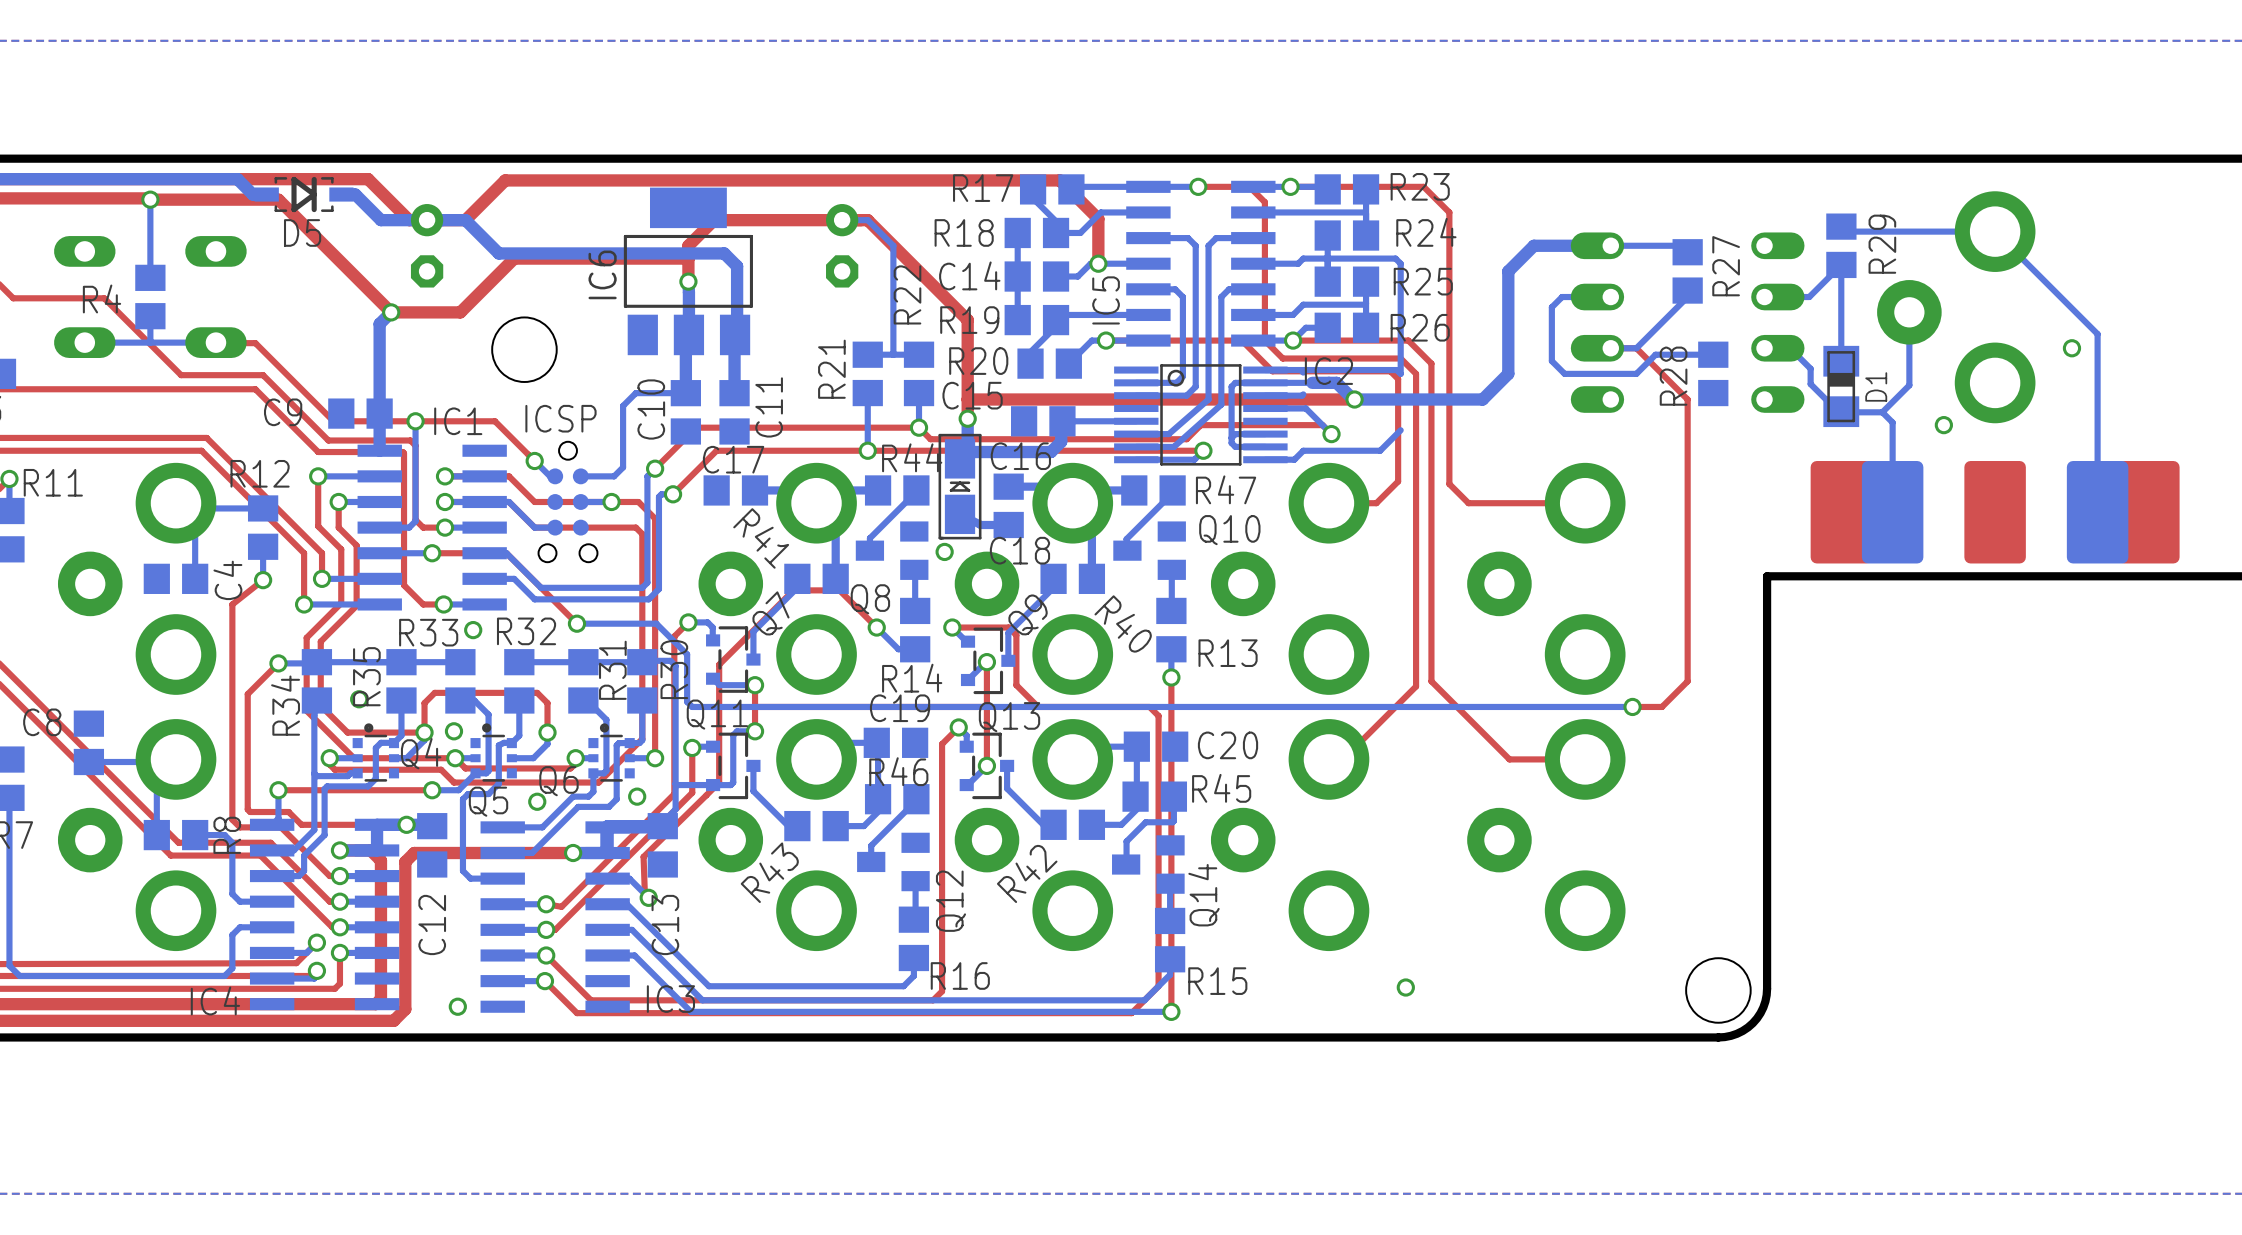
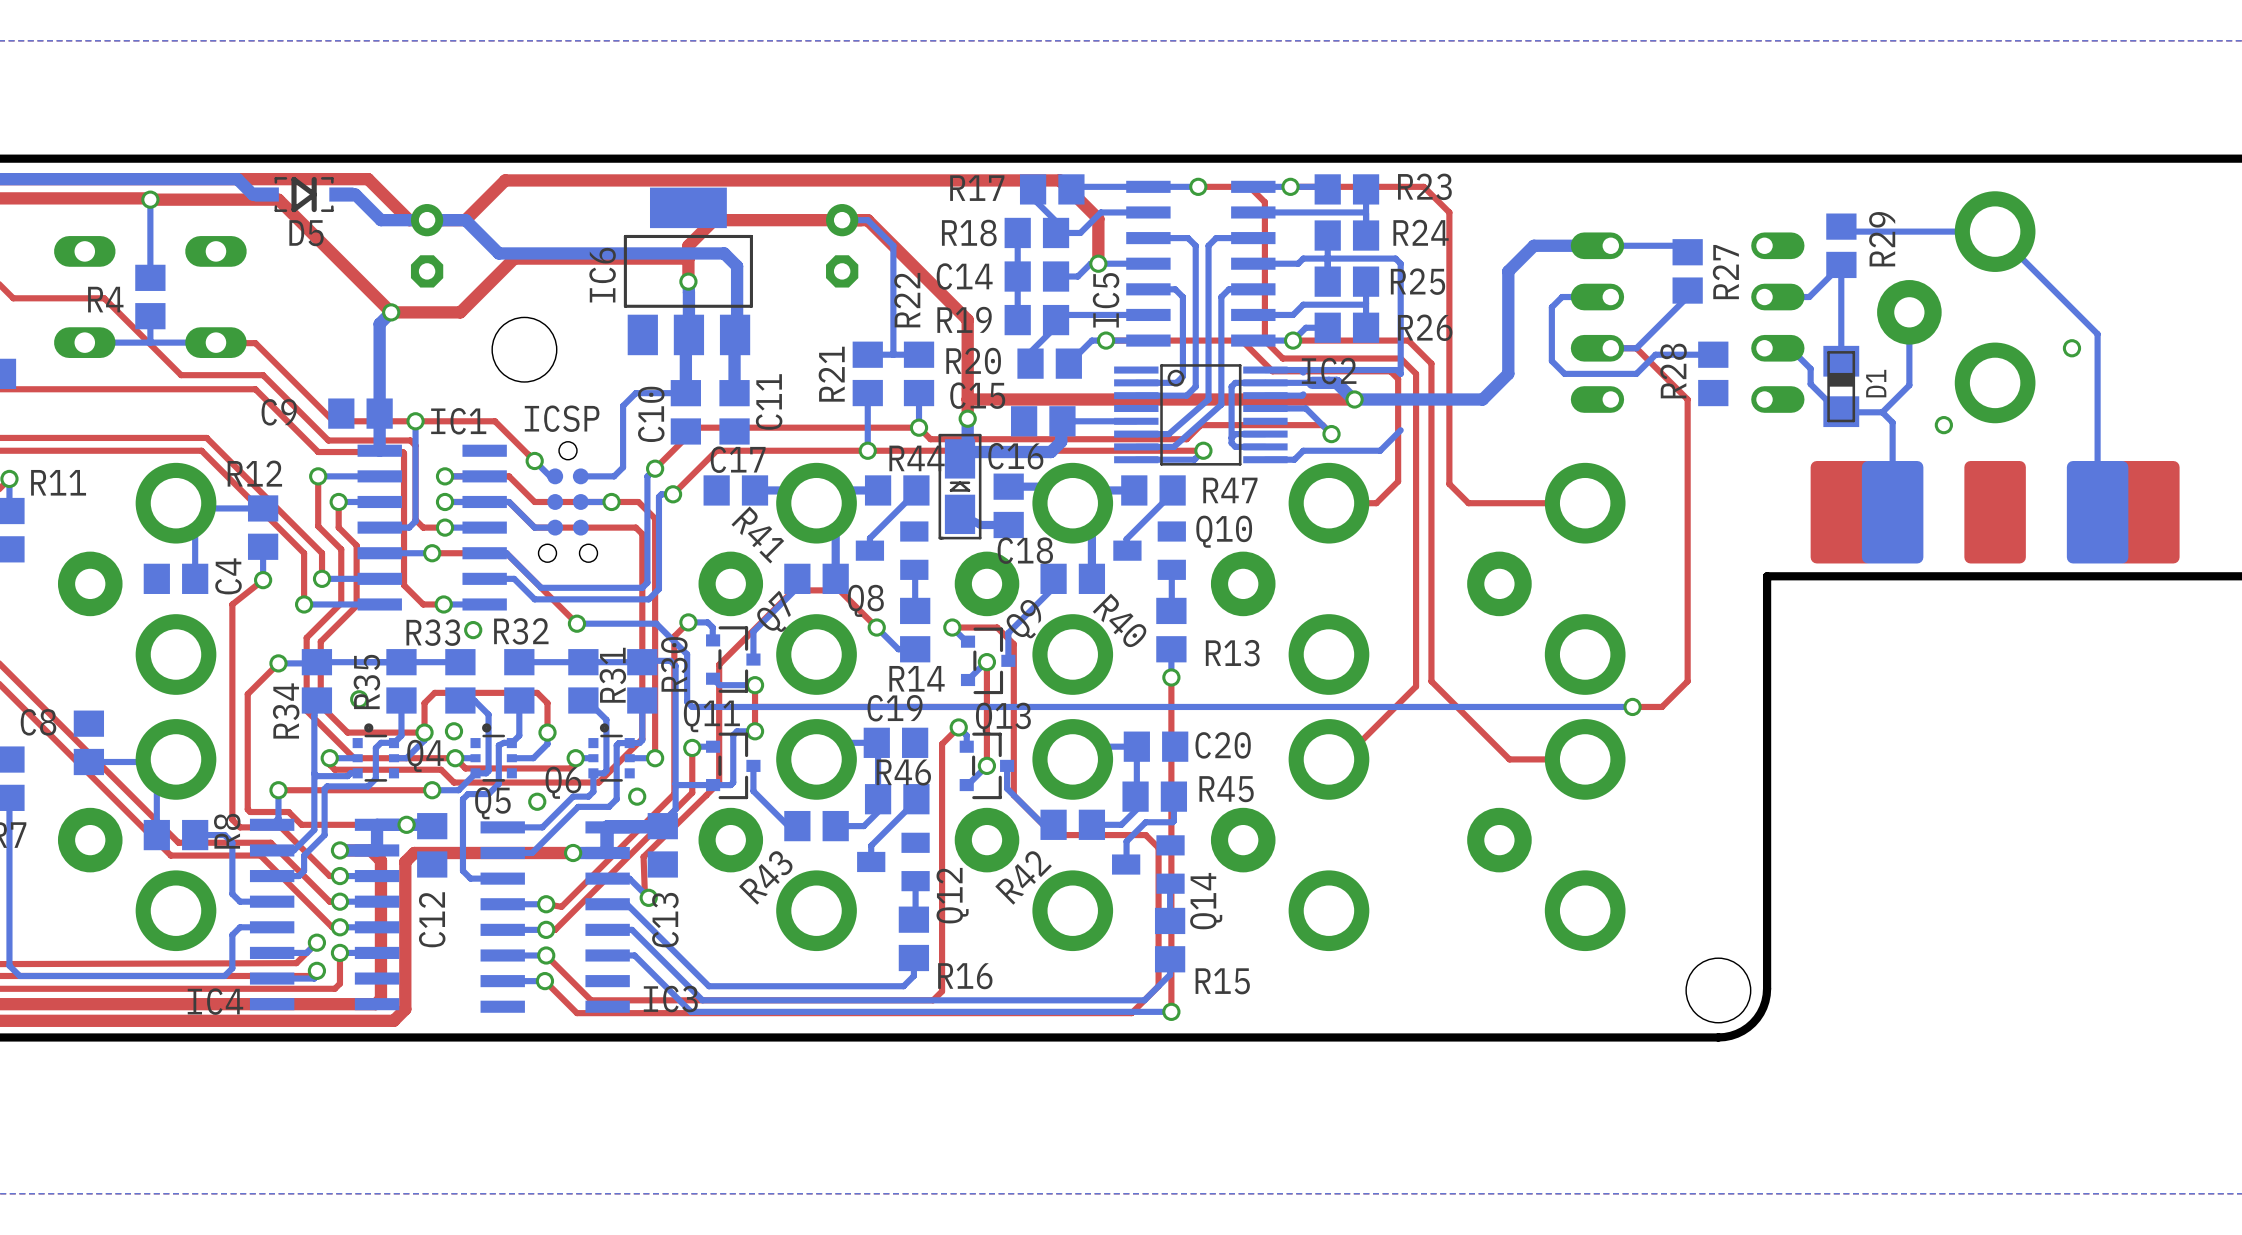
via: (944, 551) -> none
top track: (997, 627) (1008, 627) (1016, 635) (1016, 685) (1038, 706) (1149, 706) (1158, 715) (1158, 847) -> (997, 627) (1013, 644) (1013, 795) (1053, 835) (1145, 835) (1158, 847)
via: (1405, 987) -> none
via: (457, 1006) -> none

